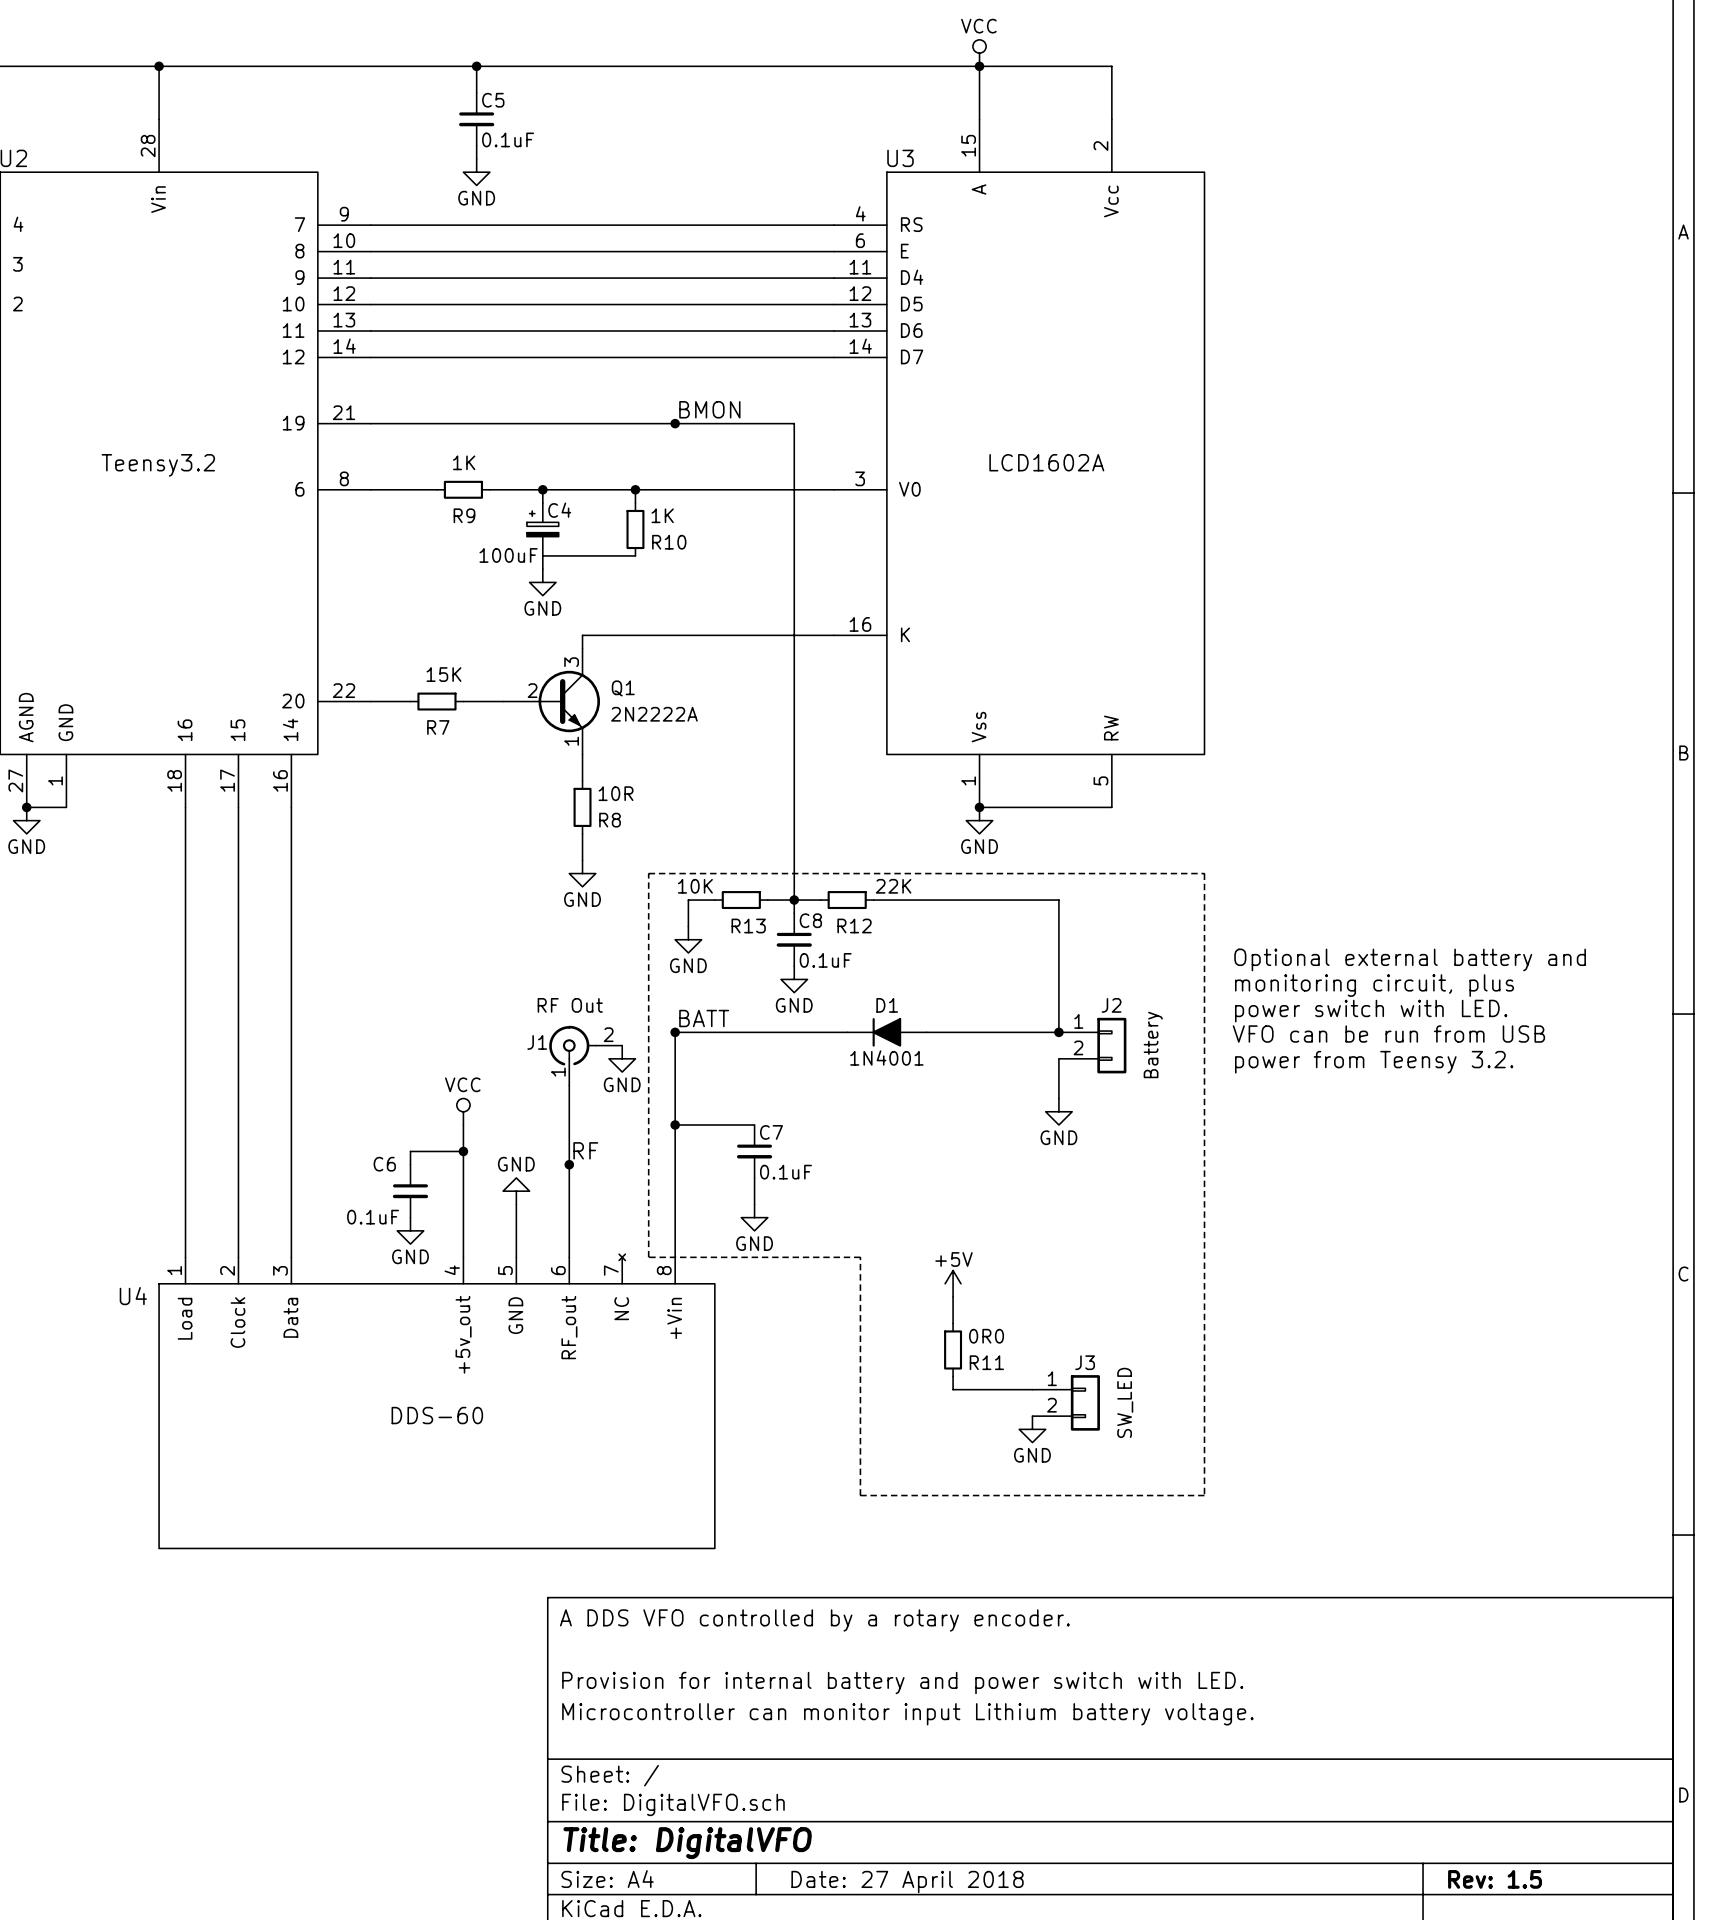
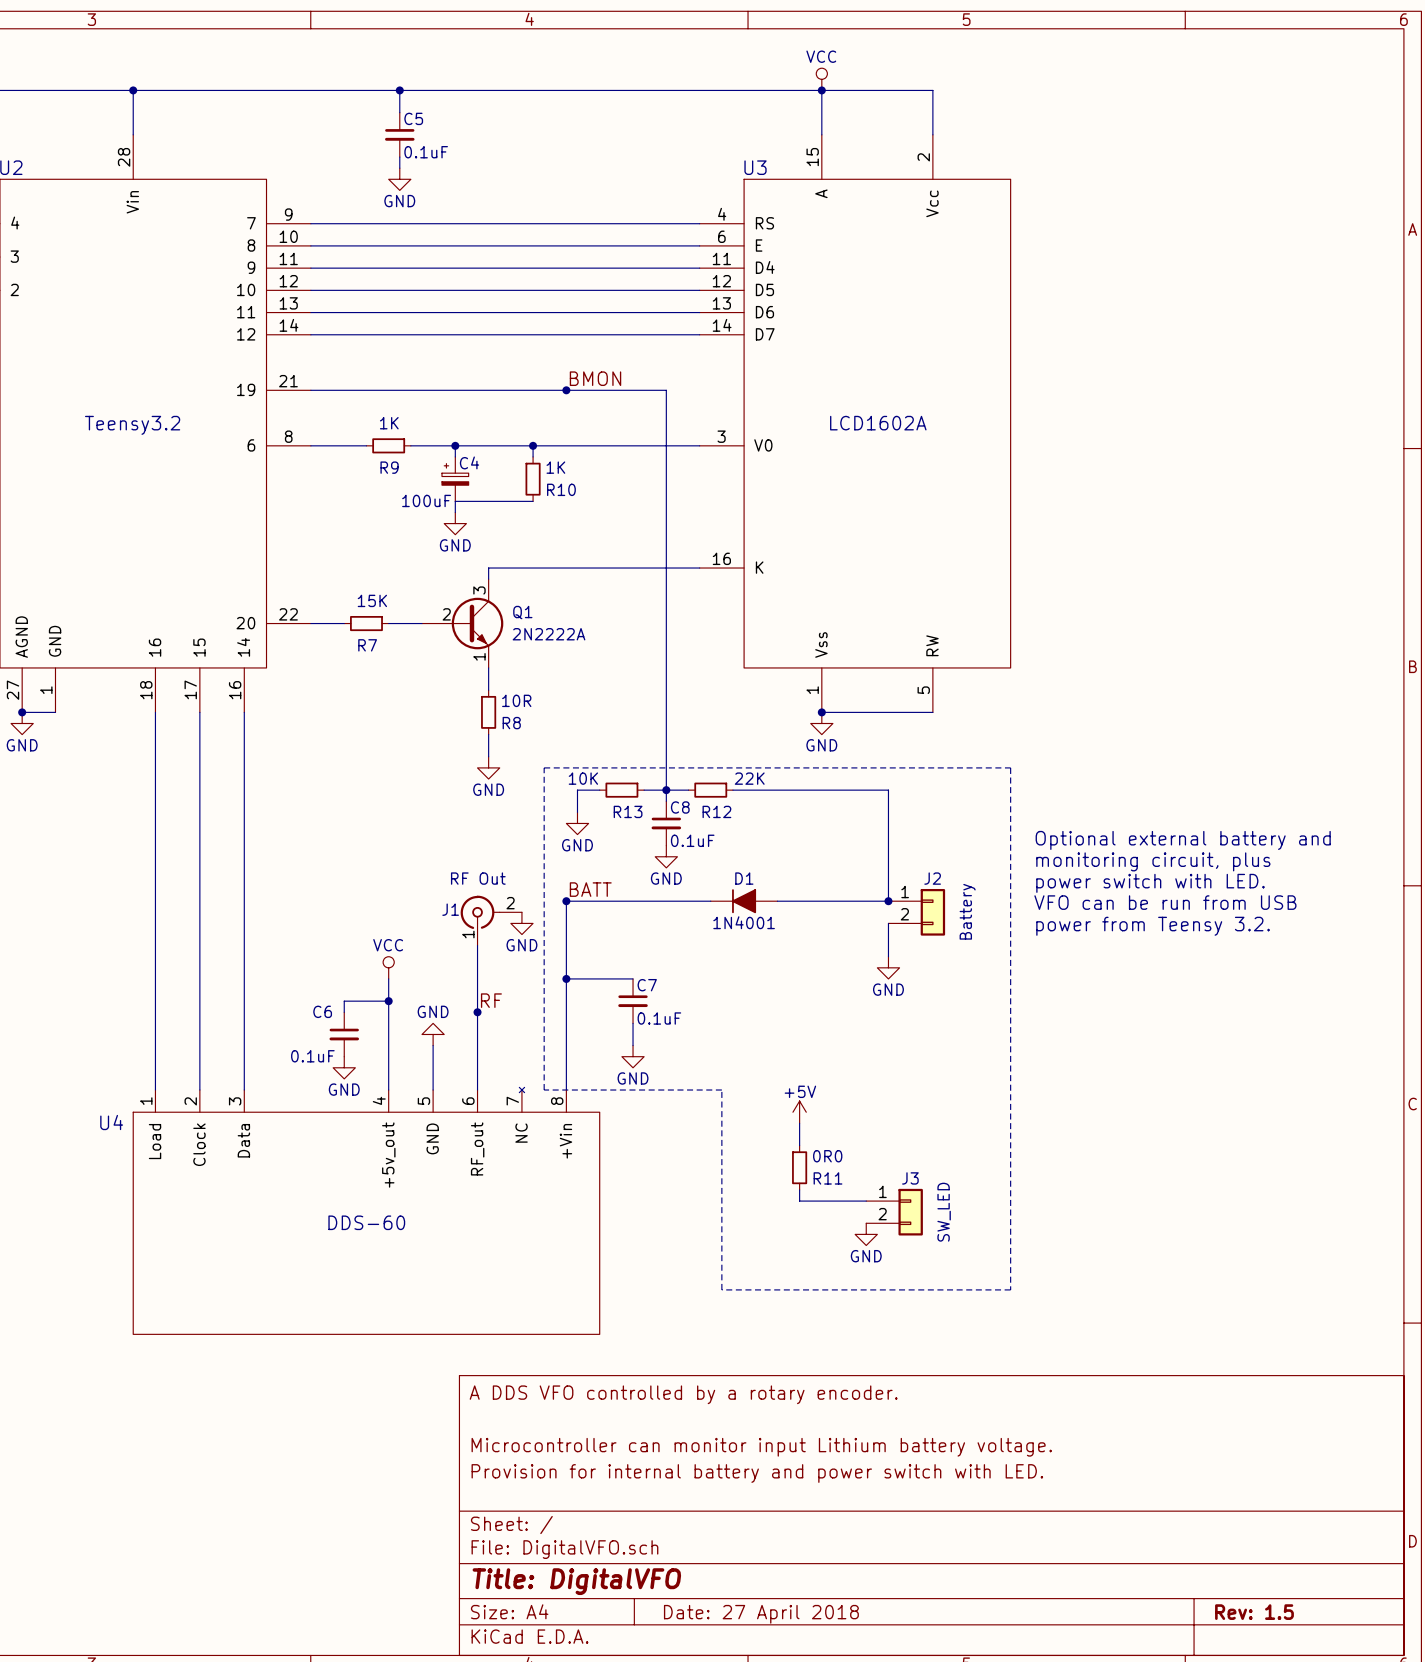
title block: Provision for internal battery and power switch with LED. (902, 1683) -> Microcontroller can monitor input Lithium battery voltage. (761, 1447)
title block: Microcontroller can monitor input Lithium battery voltage. (907, 1714) -> Provision for internal battery and power switch with LED. (757, 1473)

